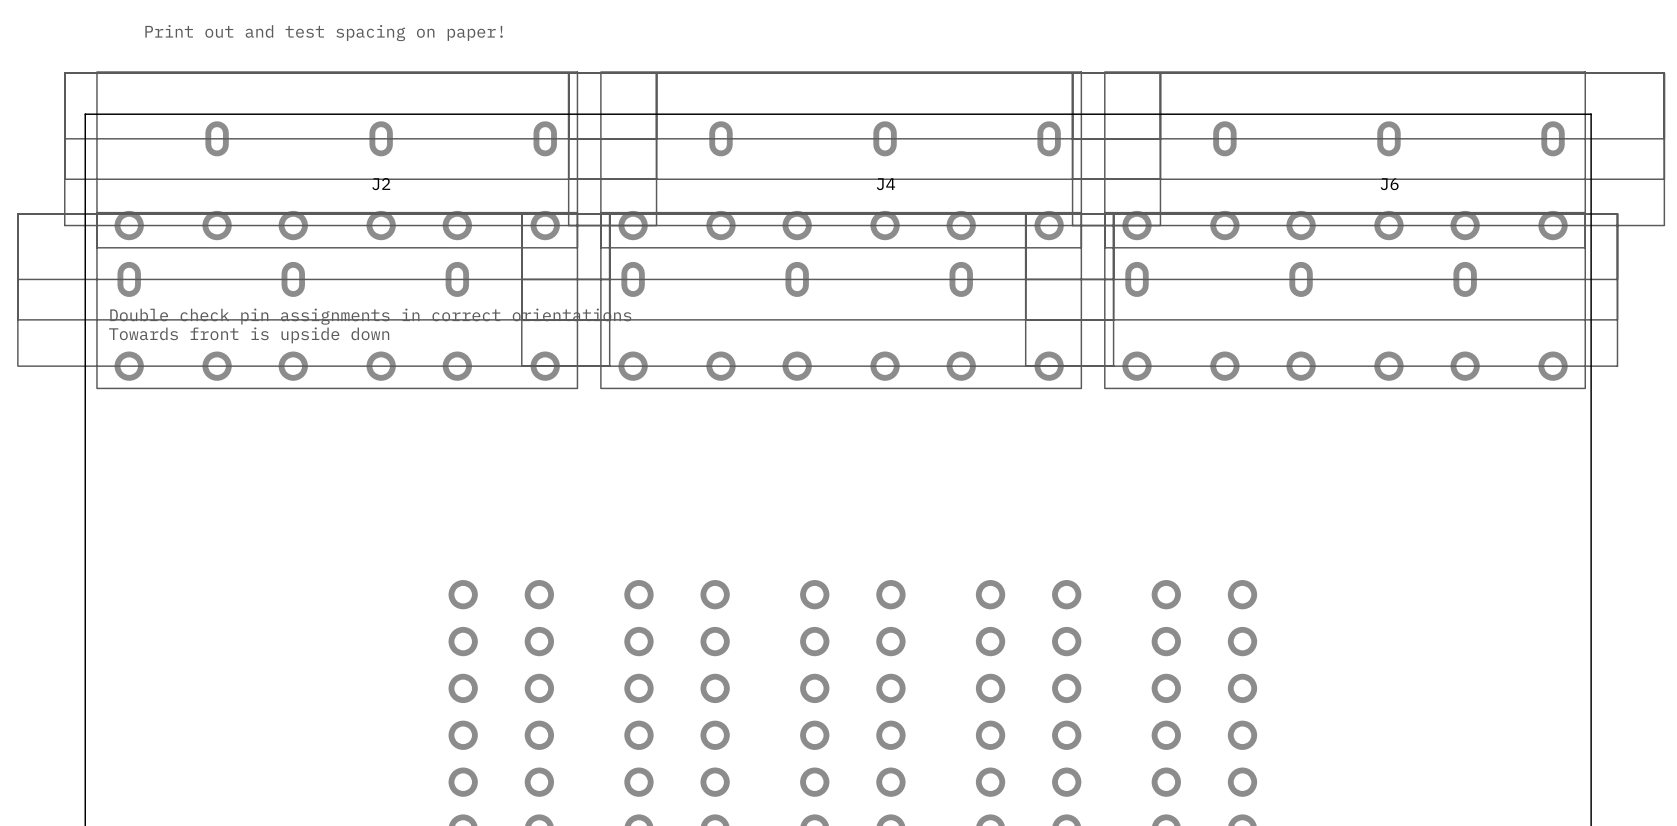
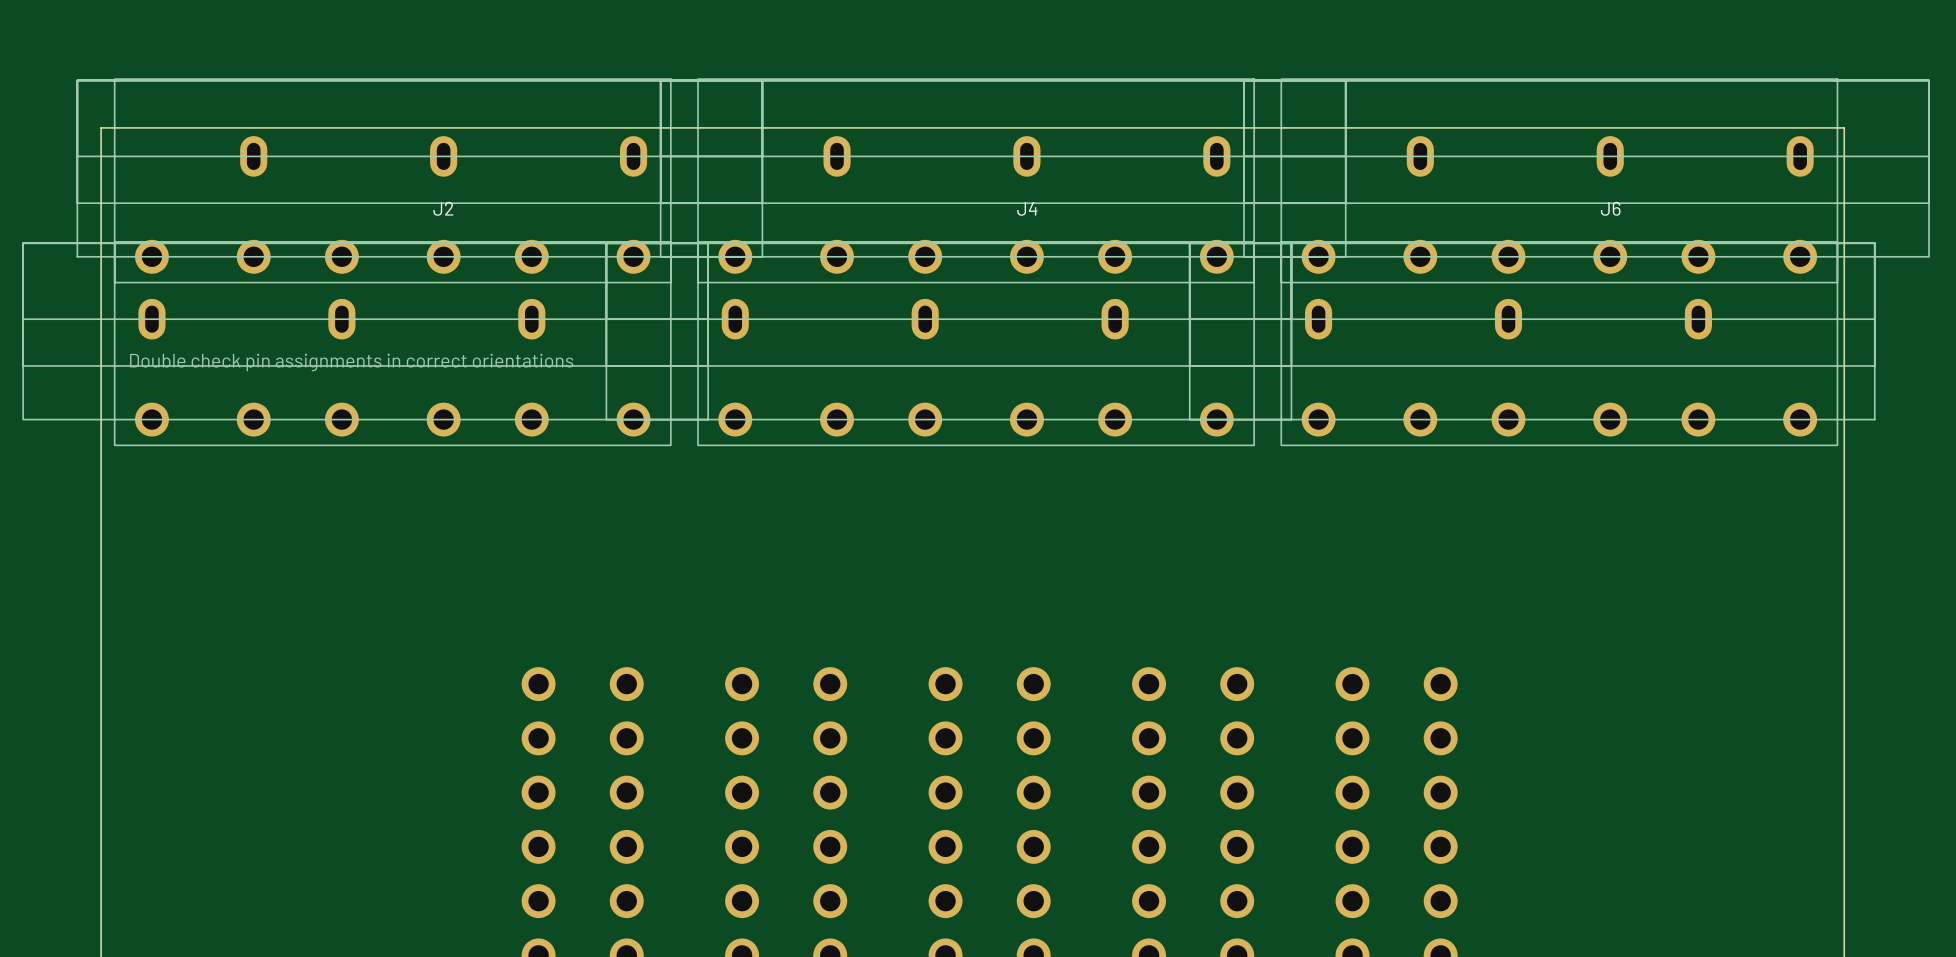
text: Print out and test spacing on paper! (324, 33) -> none
text: Towards front is upside down (249, 335) -> none

